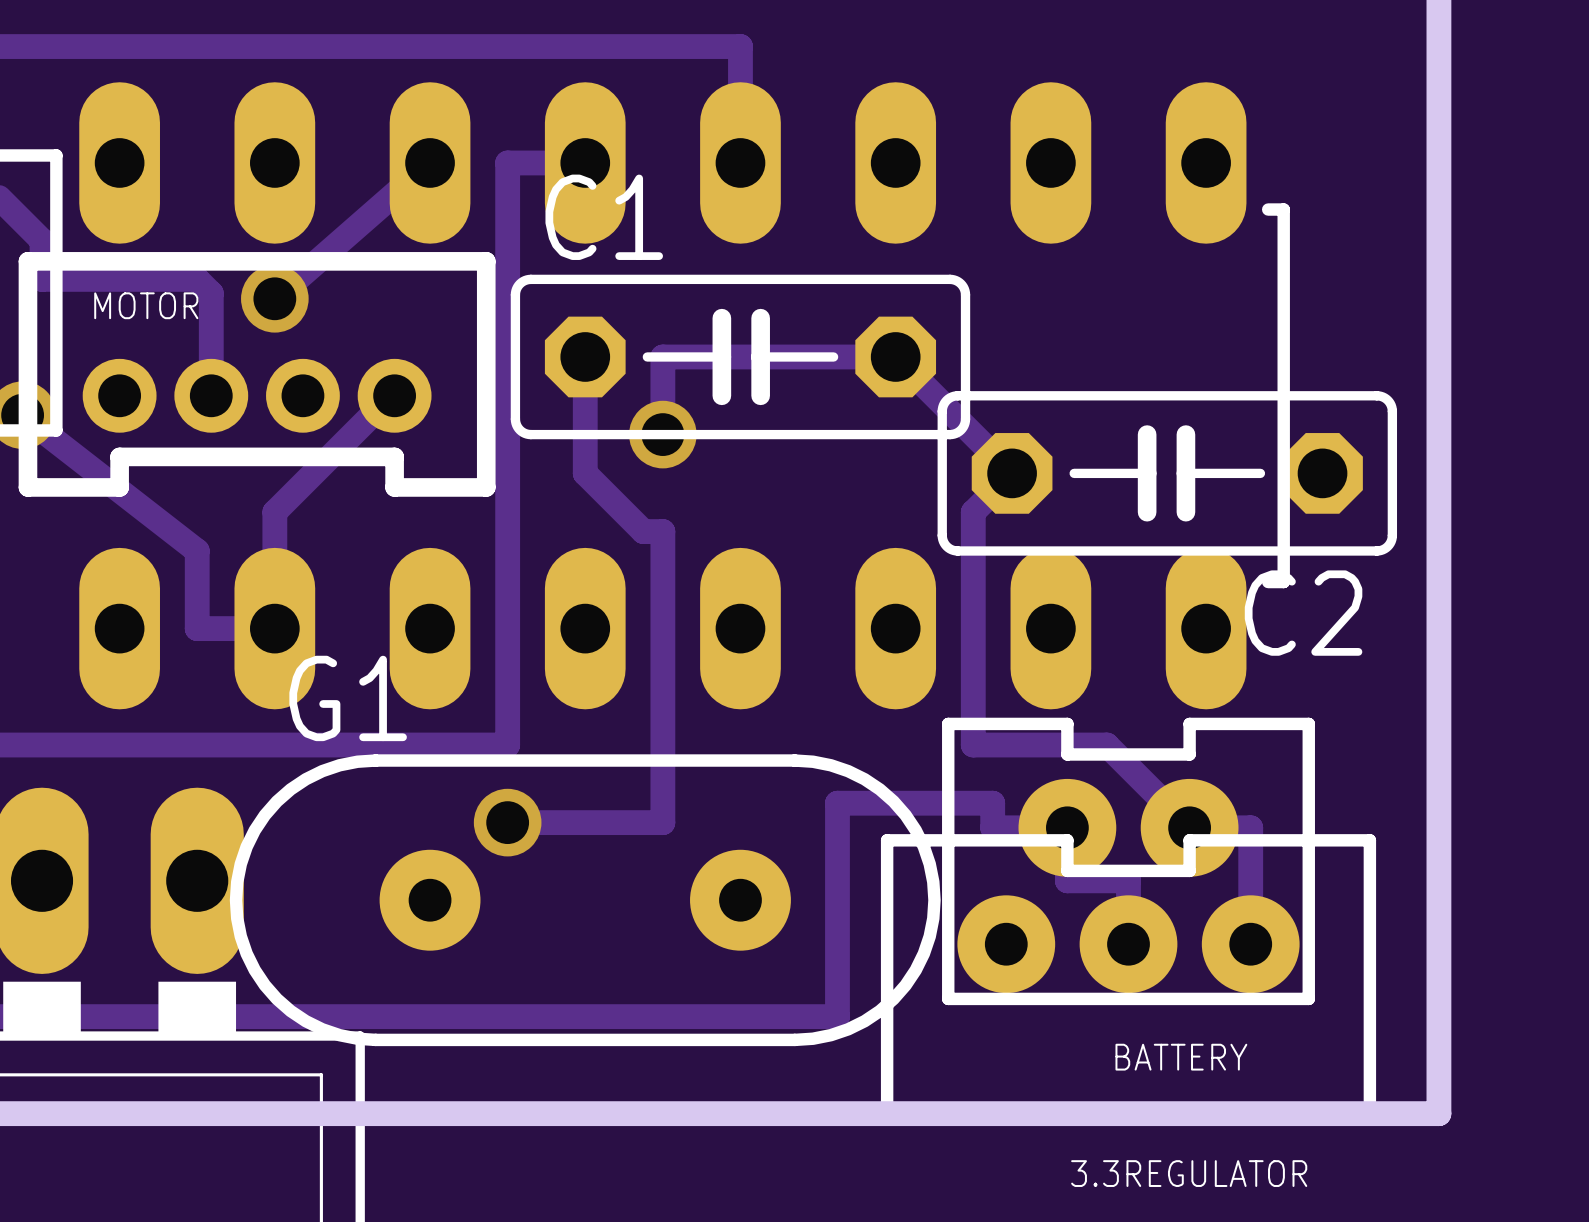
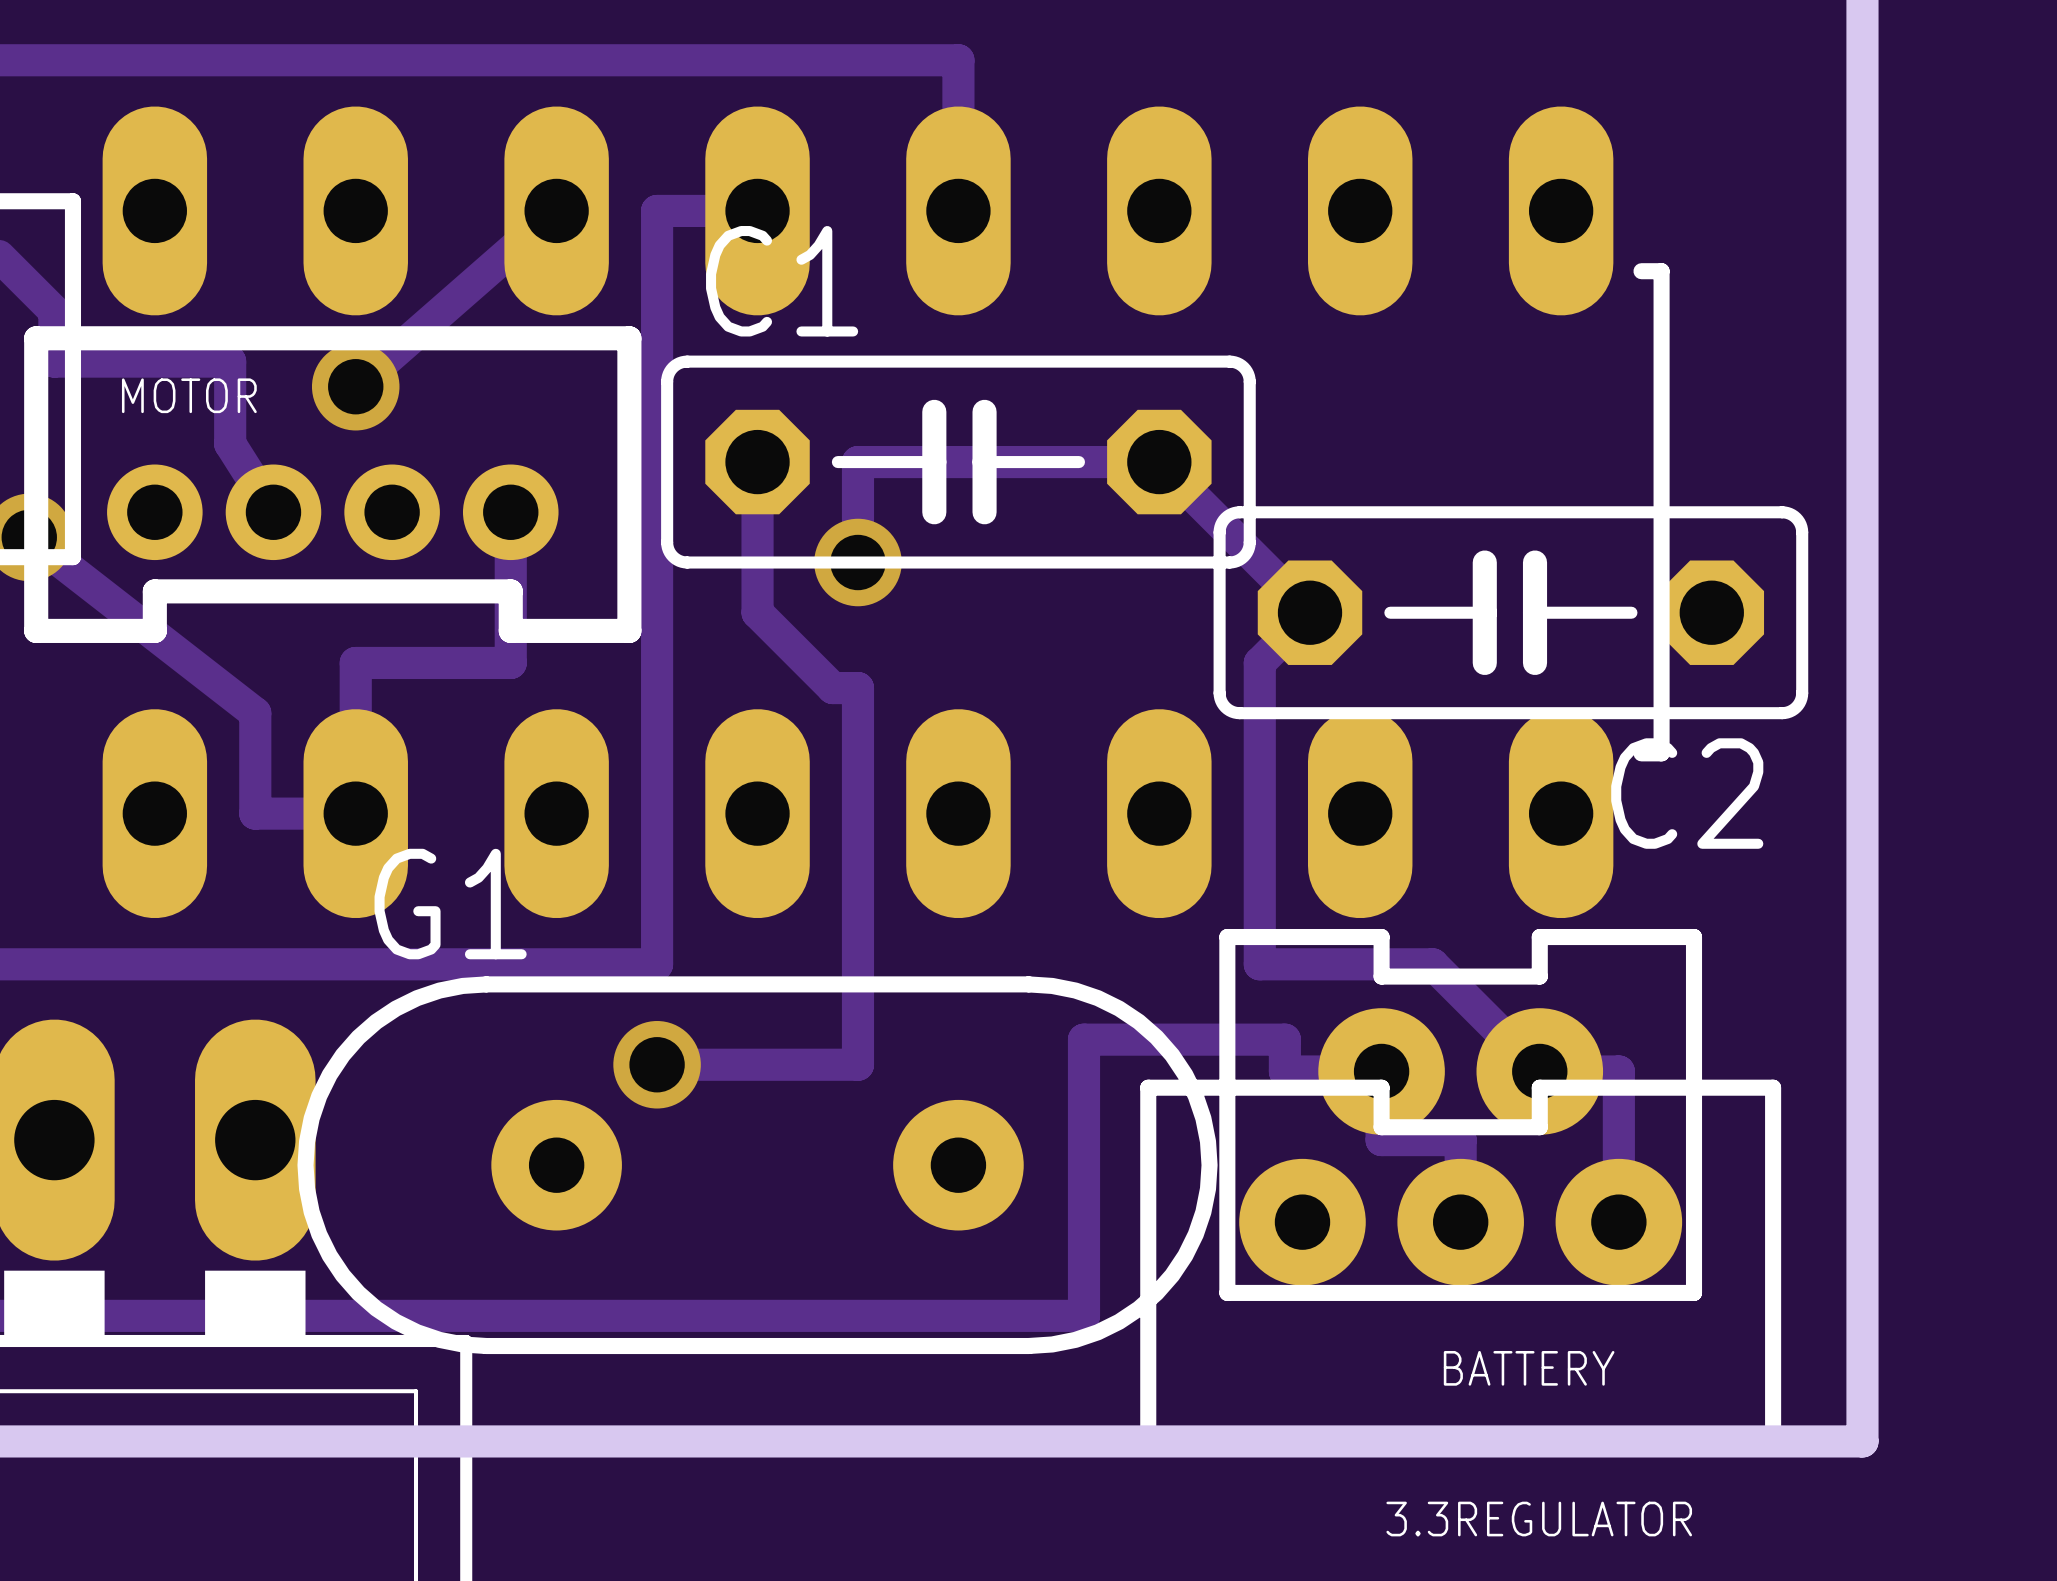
track: (177, 279) (197, 279) (211, 293) (211, 395) -> (230, 361) (230, 443) (273, 512)
track: (394, 395) (391, 395) (274, 512) -> (510, 512) (510, 662) (355, 662)

